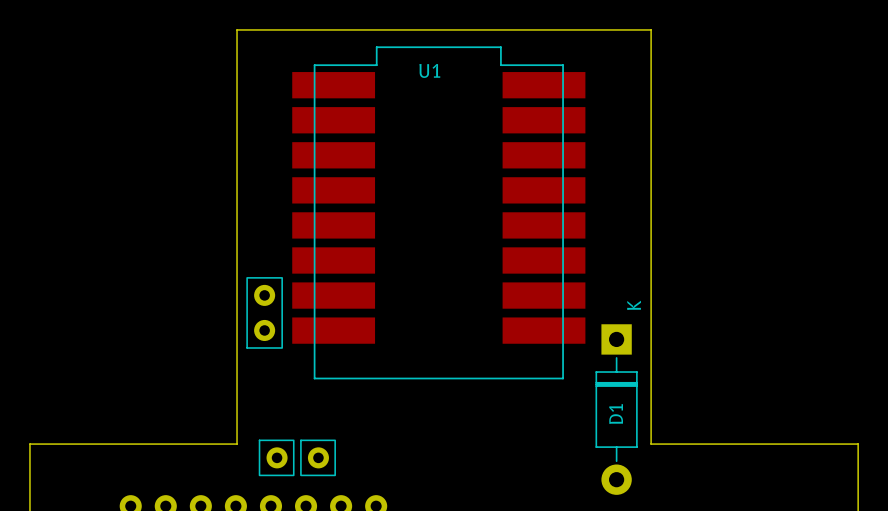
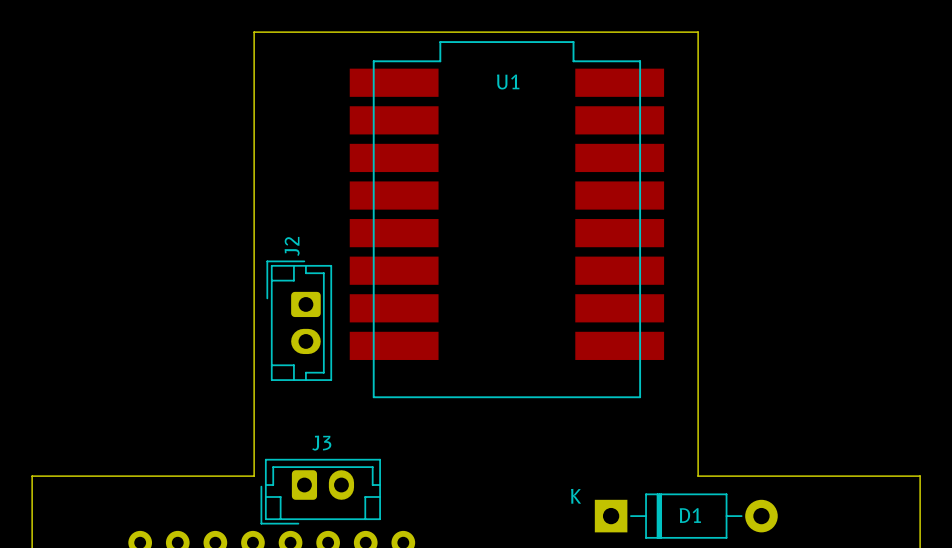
U1 name position: U1 (429, 70) -> U1 (508, 81)
U1 position: (438, 212) -> (506, 219)
J2: none -> (299, 320)
part: (264, 312) -> none
D1 rotation: 0° (616, 409) -> 90° counterclockwise (686, 516)
part: (276, 457) -> none
part: (318, 457) -> none
J3: none -> (320, 491)

